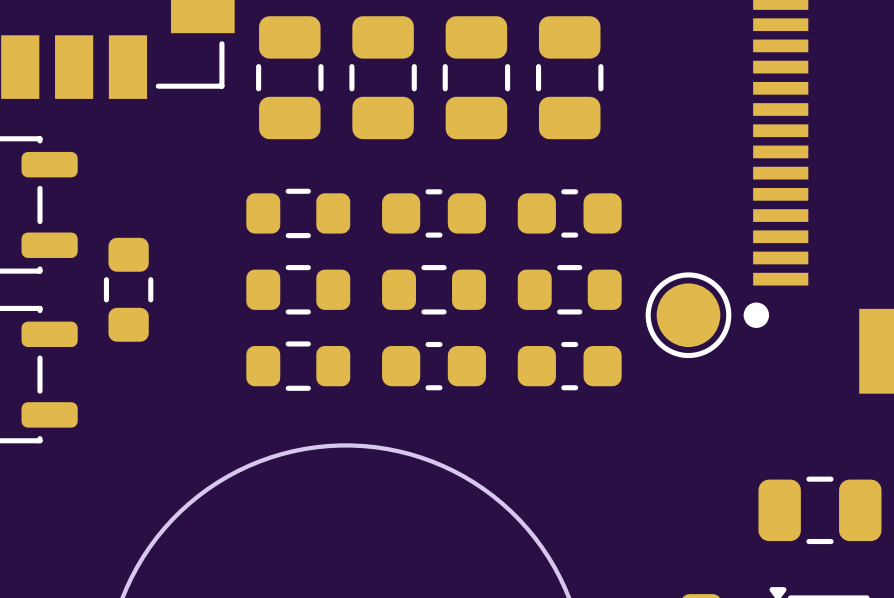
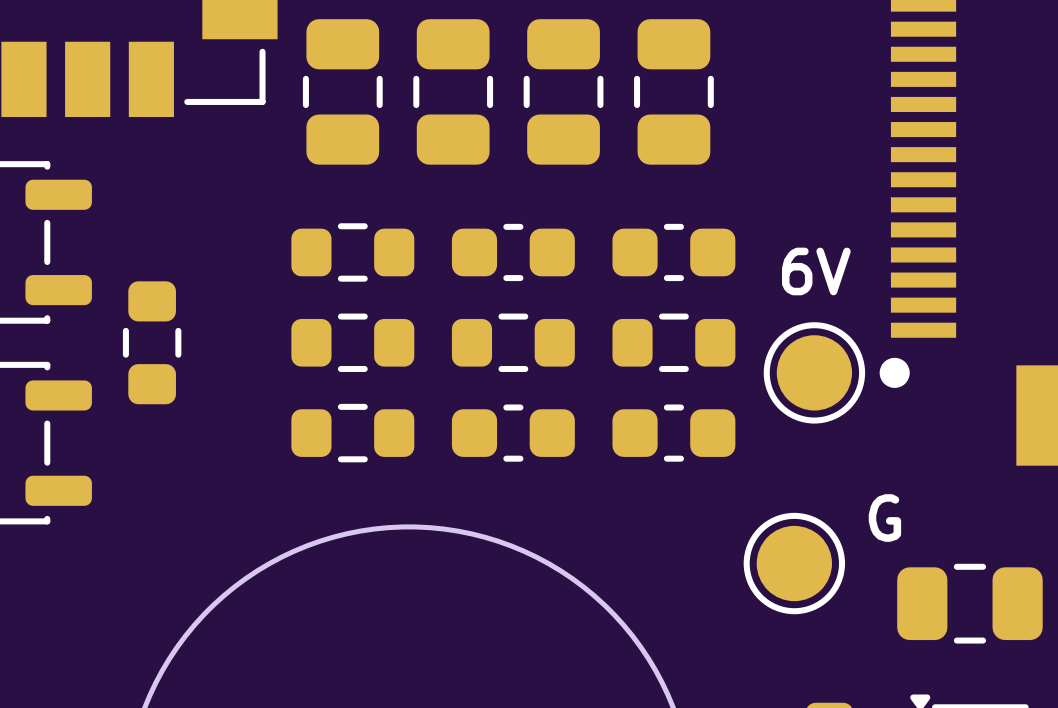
text: none -> 6V (816, 271)
text: none -> G (884, 518)
part: none -> (794, 563)

